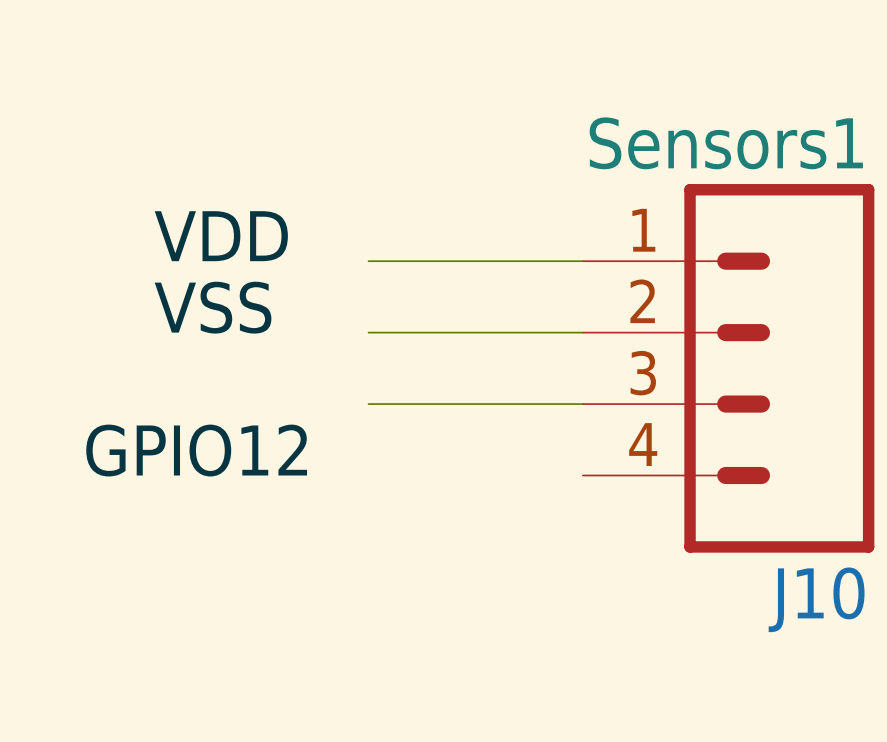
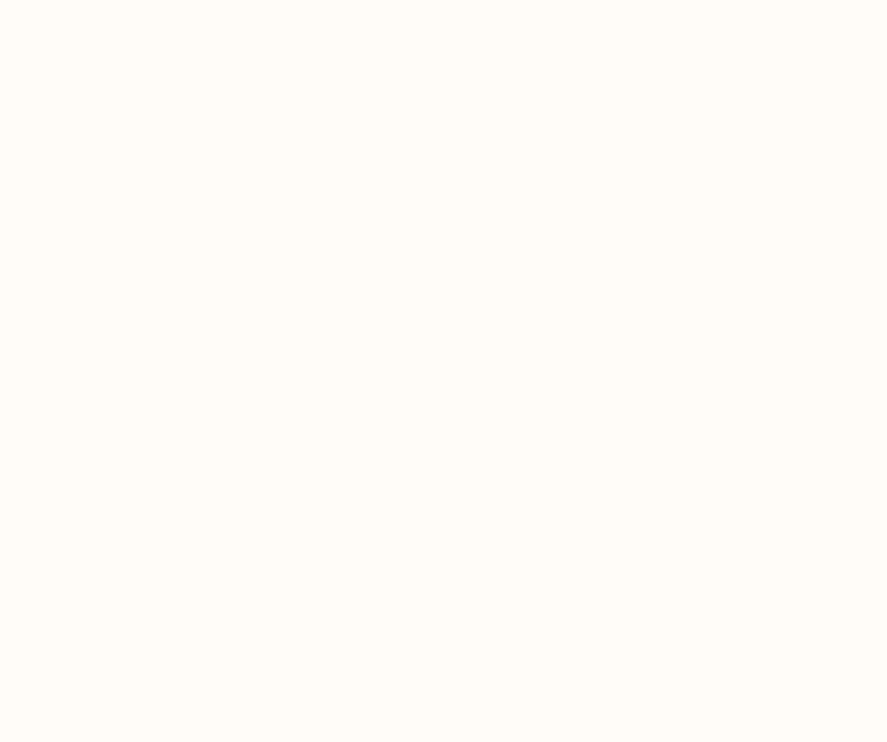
label: VDD (221, 236) -> none
wire: (368, 261) (582, 261) -> none
label: VSS (213, 307) -> none
wire: (368, 332) (582, 332) -> none
J10: Sensors1 (728, 368) -> none
wire: (368, 404) (582, 404) -> none
label: GPIO12 (196, 450) -> none

